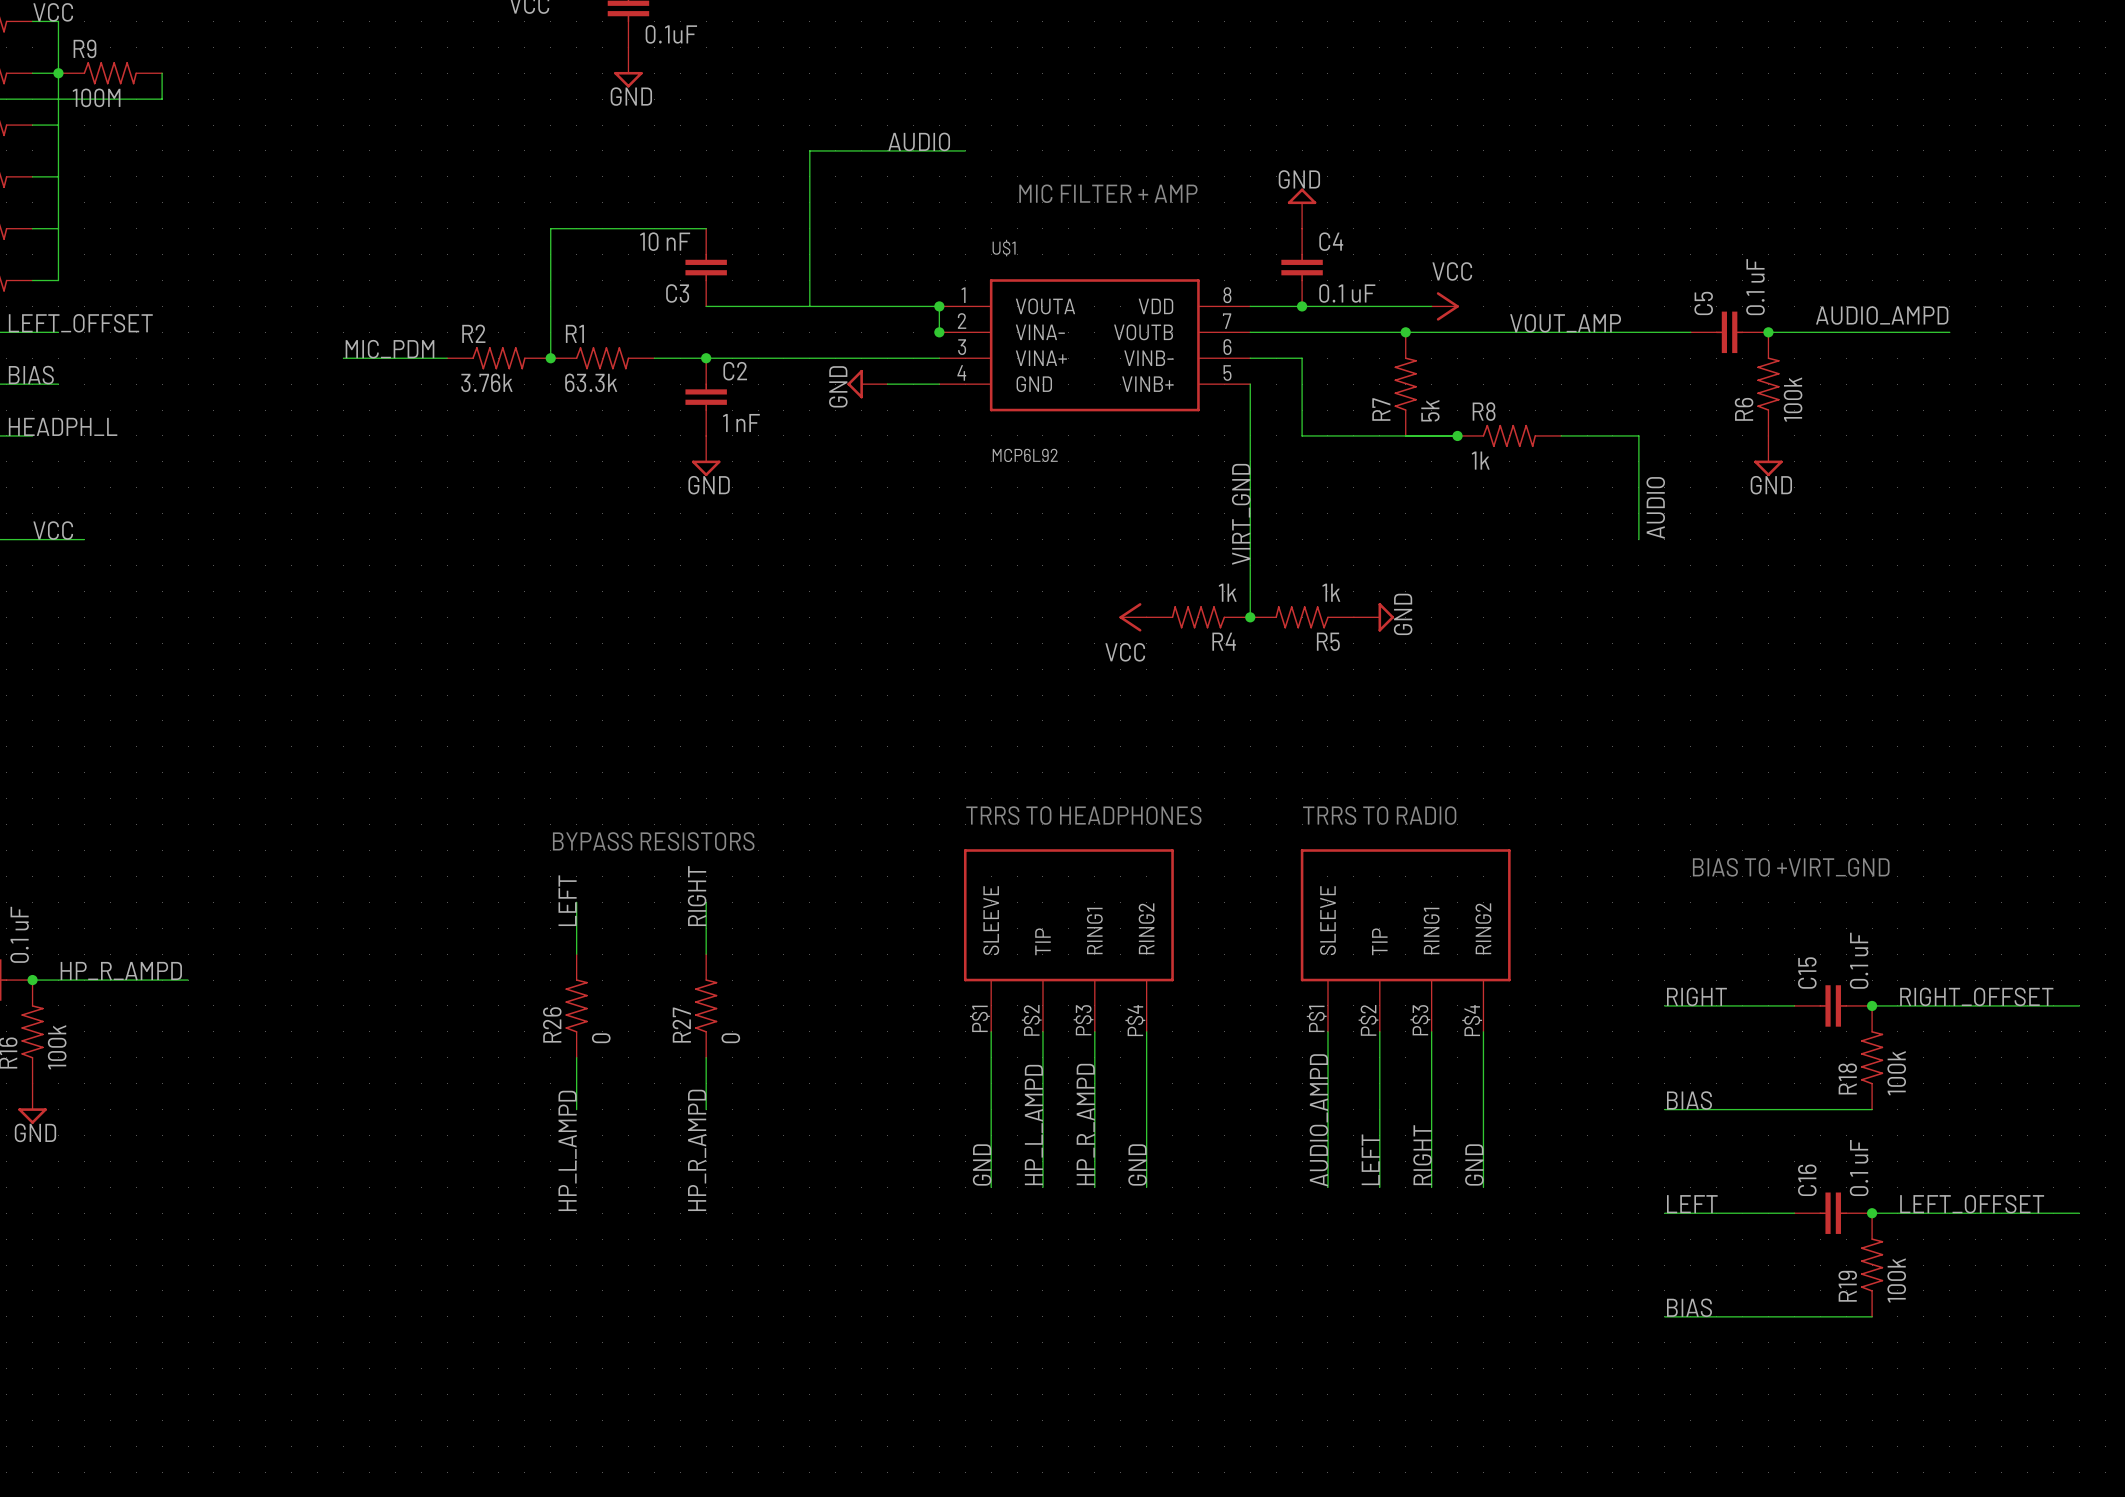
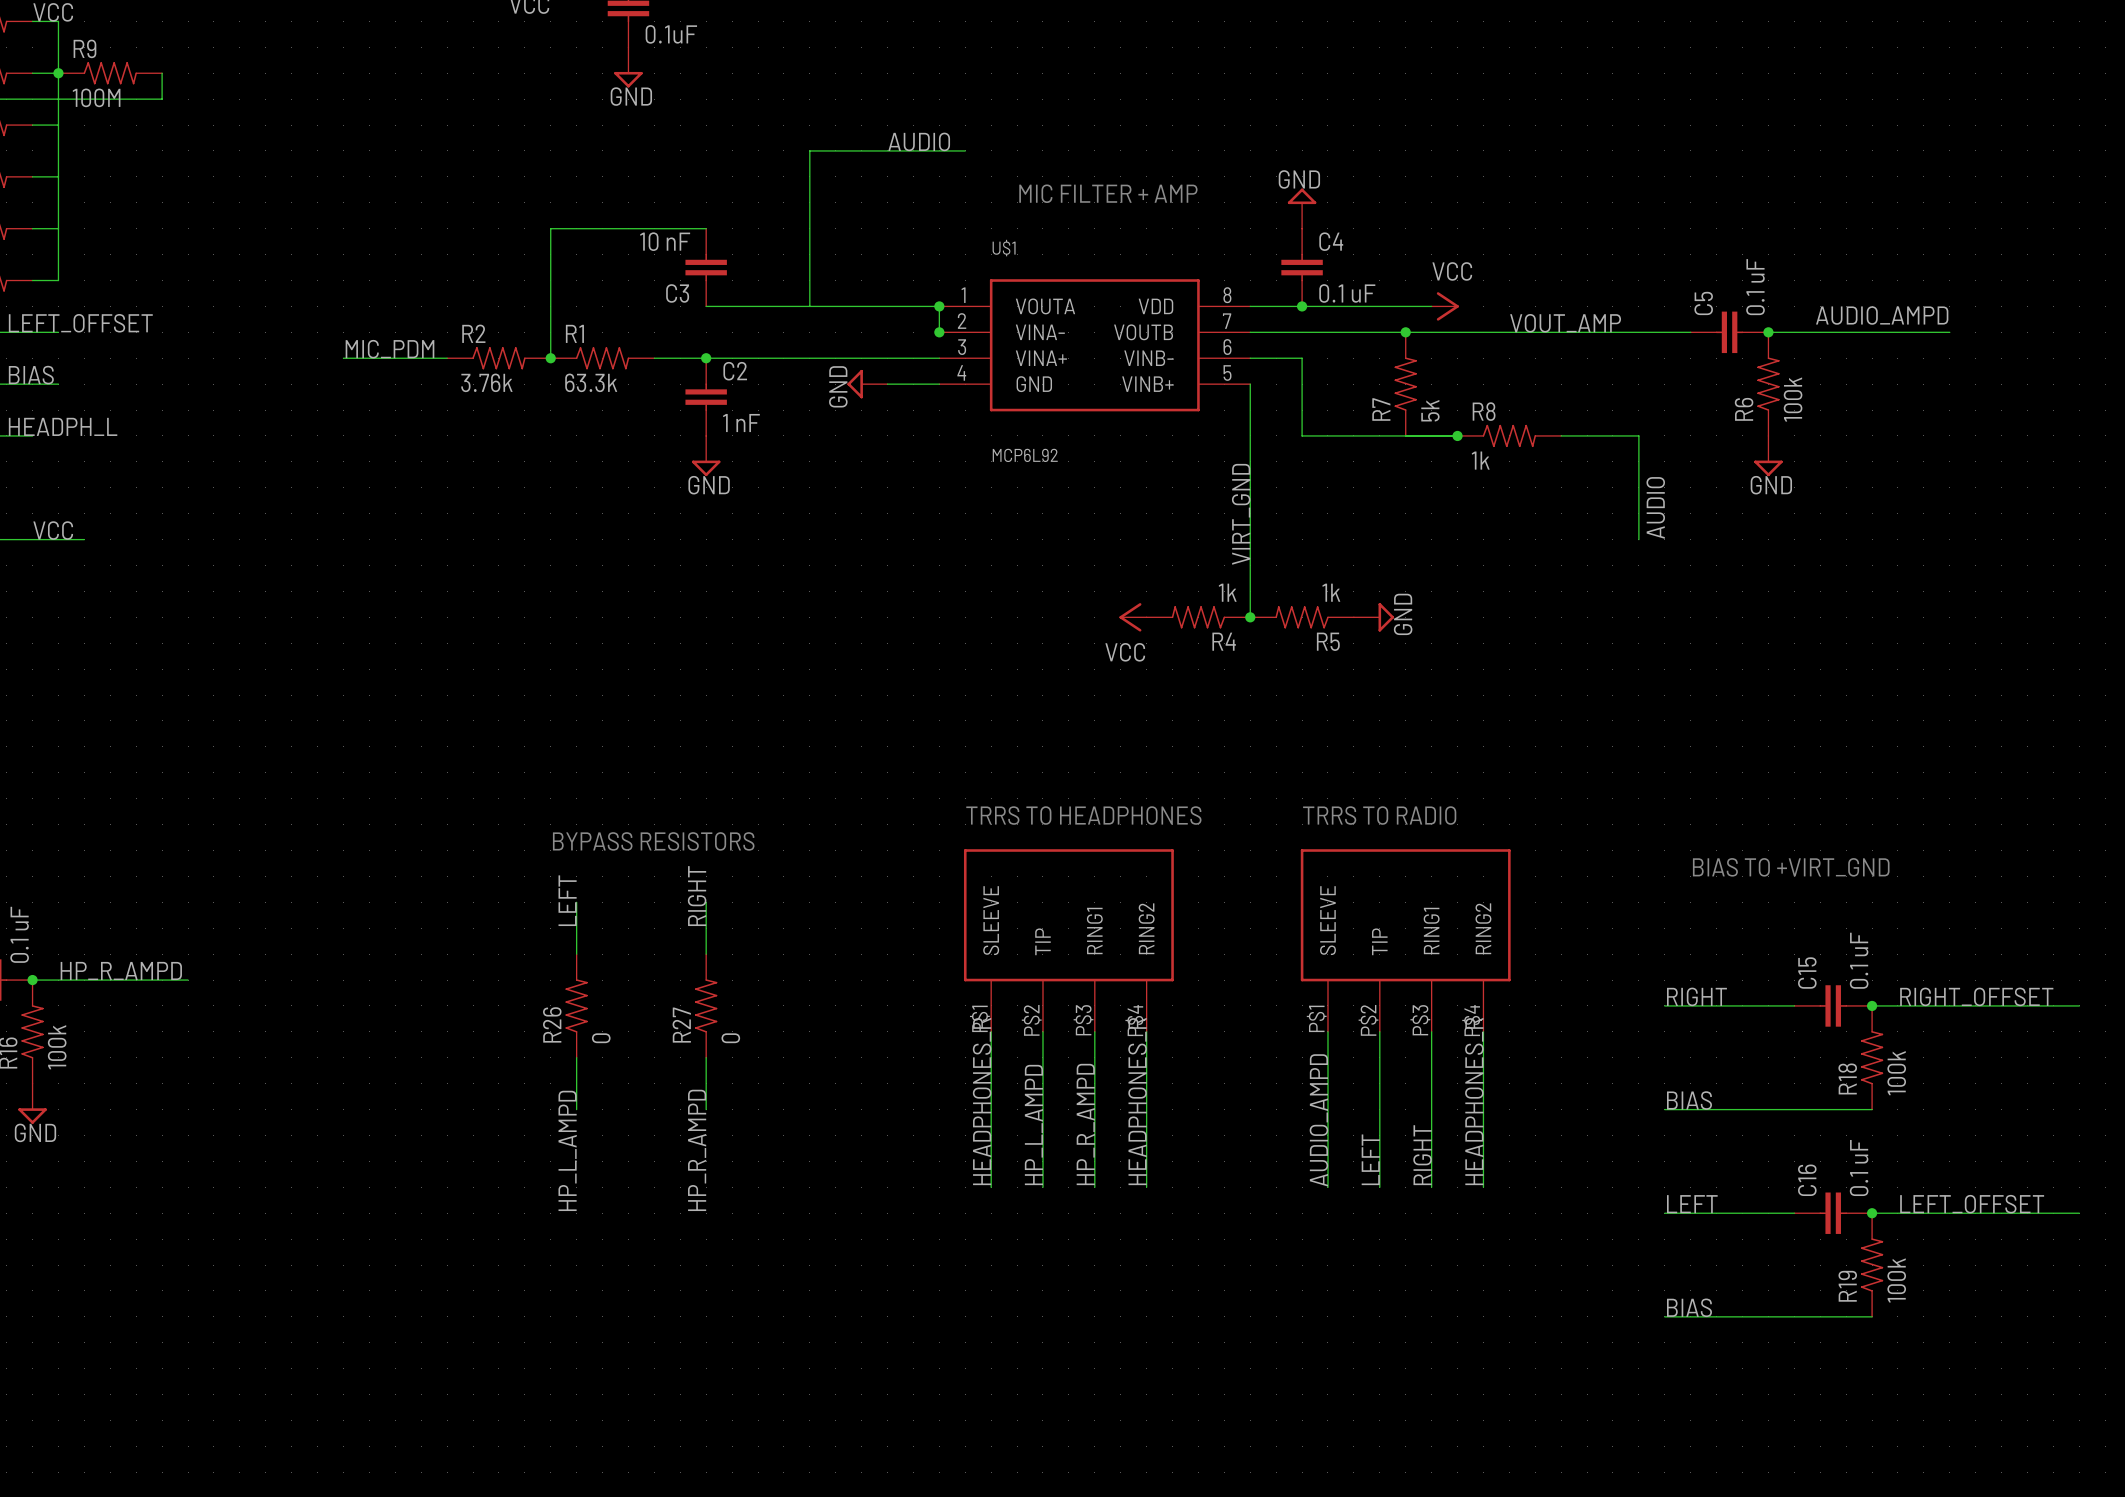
label: GND (982, 1164) -> HEADPHONES_R (982, 1101)
label: GND (1137, 1164) -> HEADPHONES_R (1137, 1101)
label: GND (1474, 1164) -> HEADPHONES_R (1474, 1101)

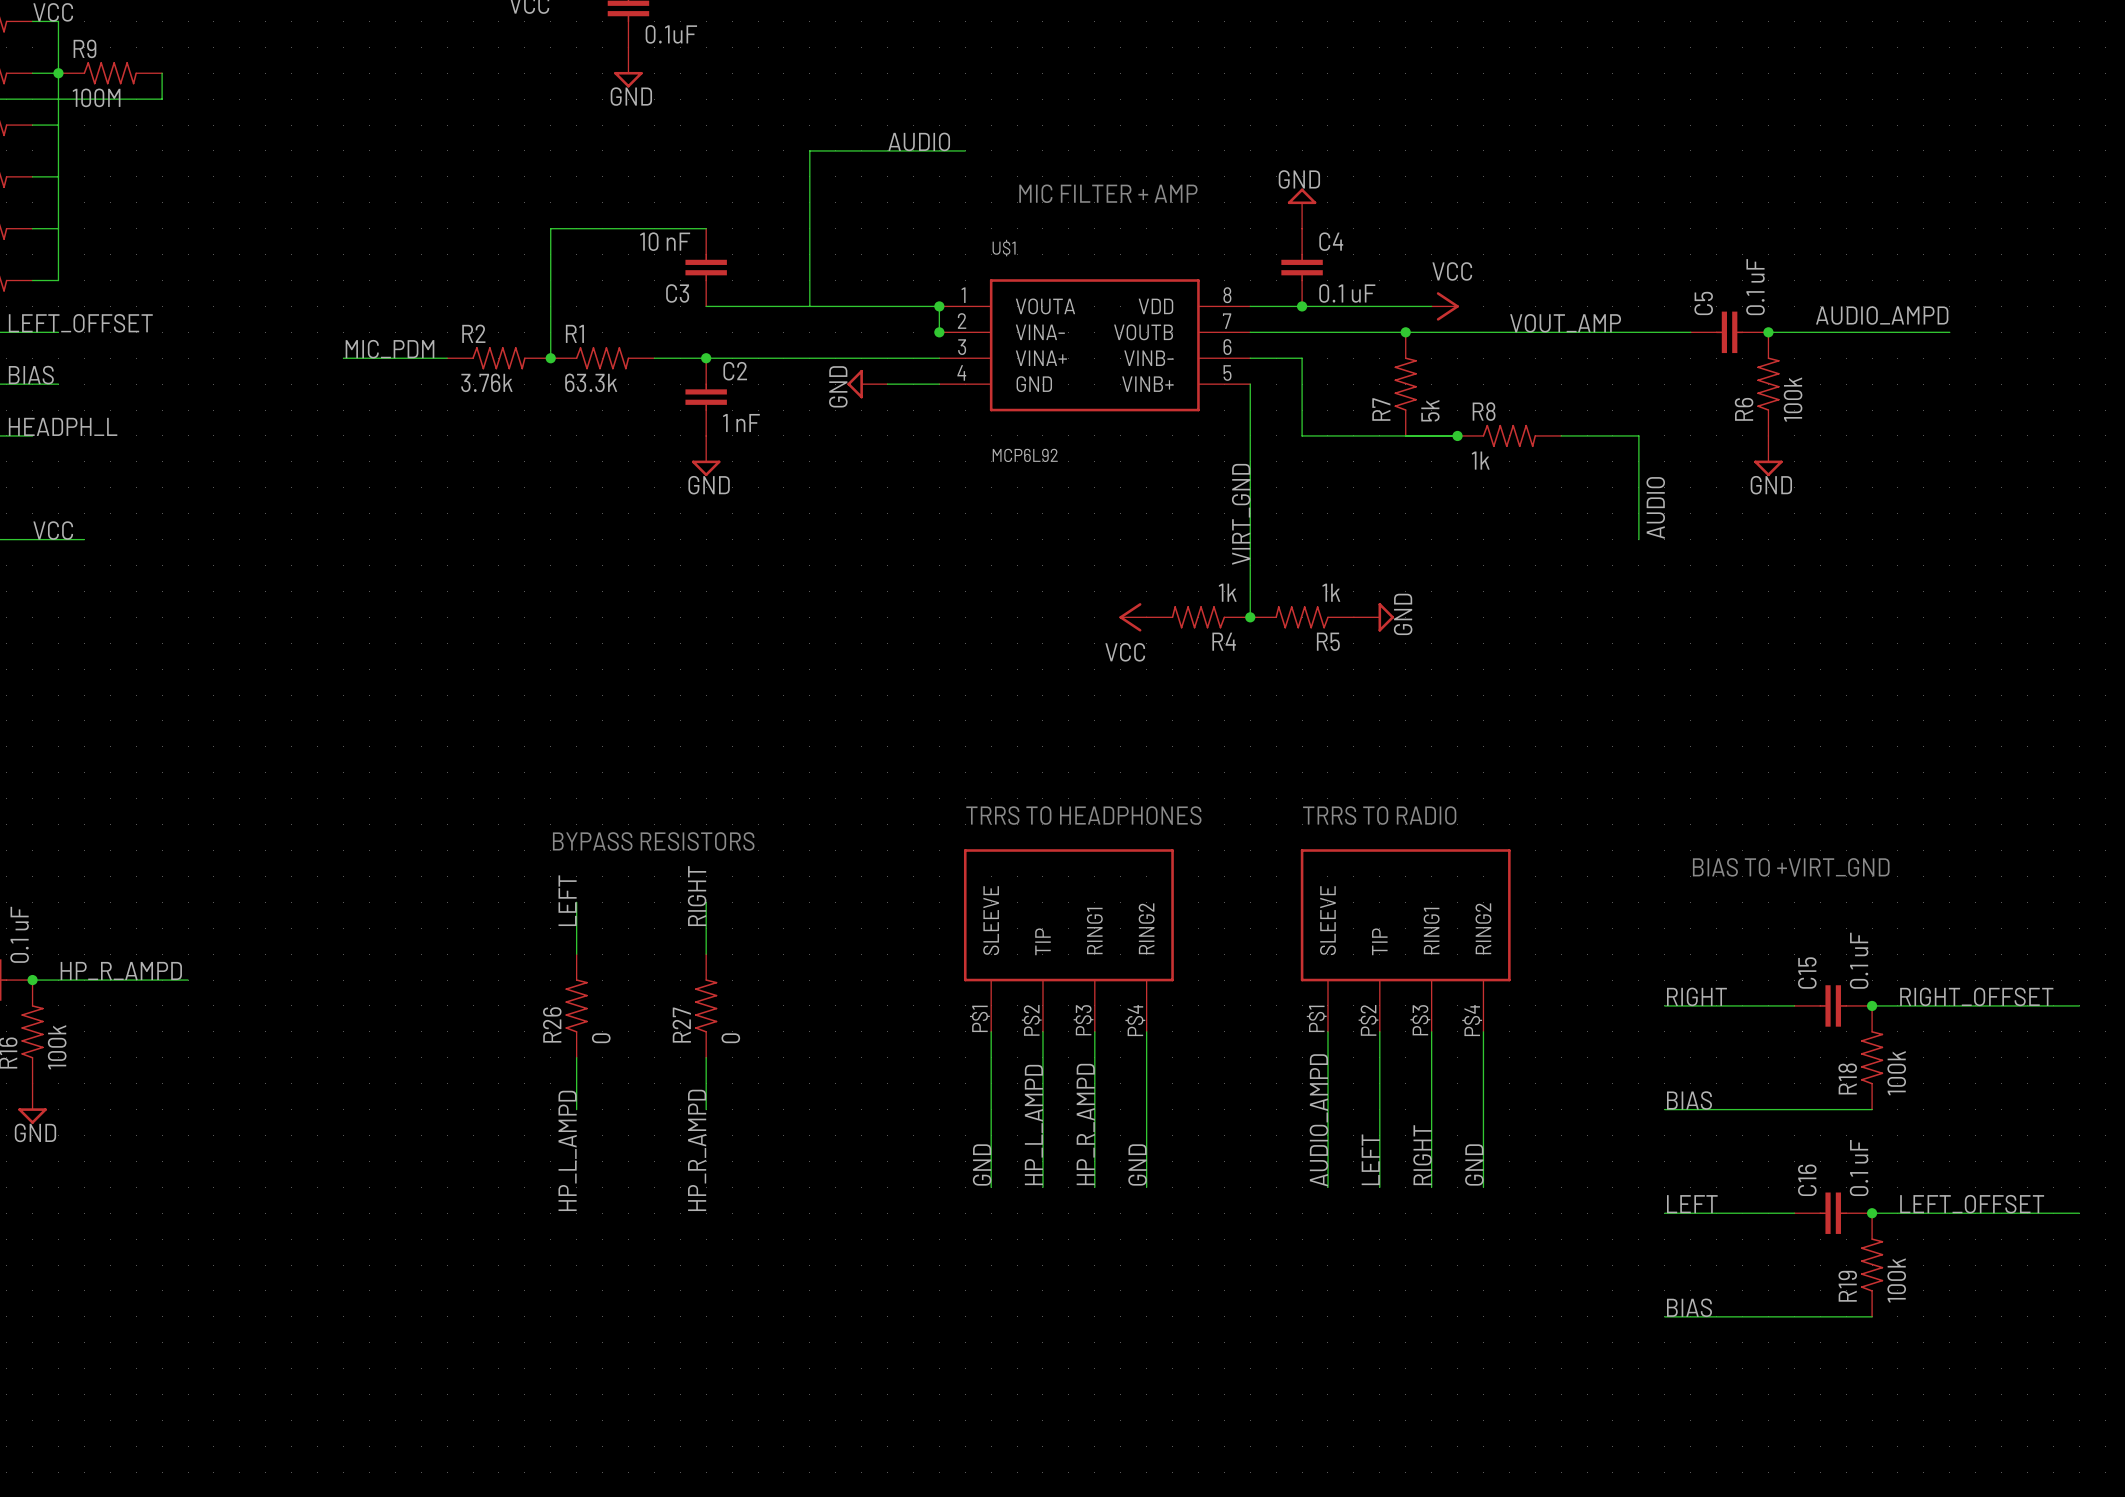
label: HEADPHONES_R (982, 1101) -> GND (982, 1164)
label: HEADPHONES_R (1137, 1101) -> GND (1137, 1164)
label: HEADPHONES_R (1474, 1101) -> GND (1474, 1164)

